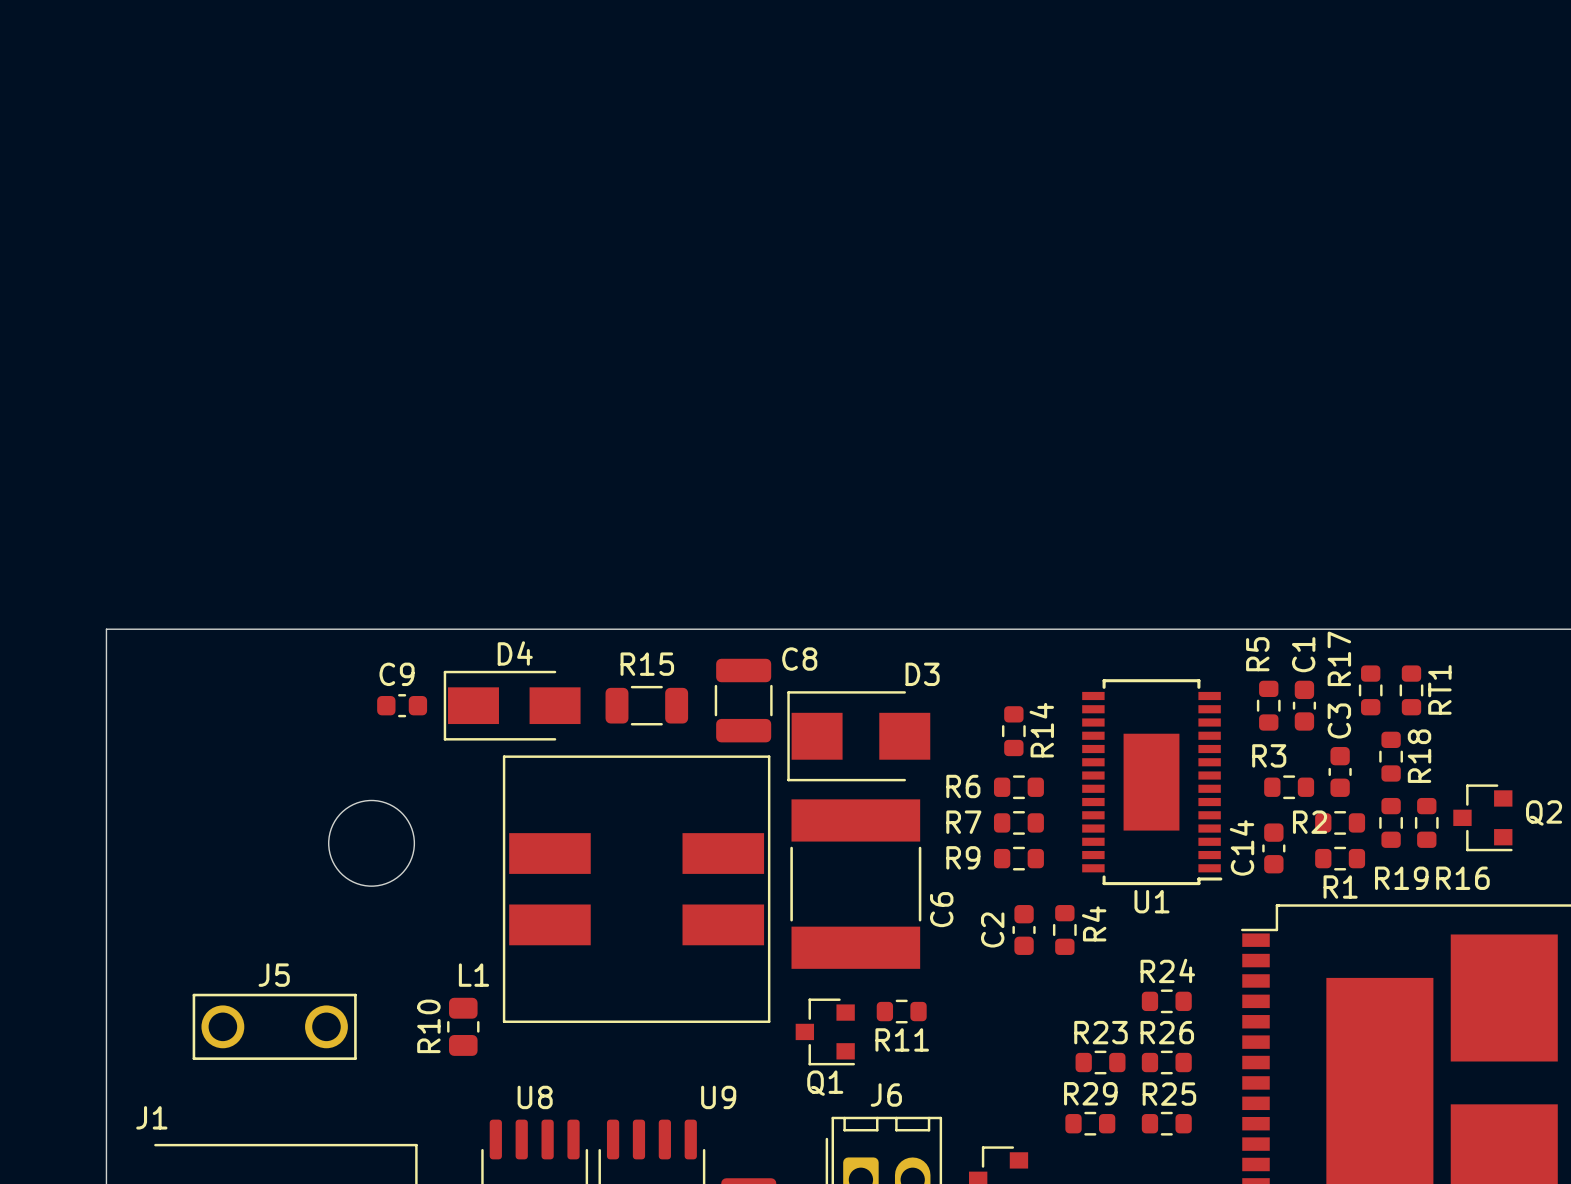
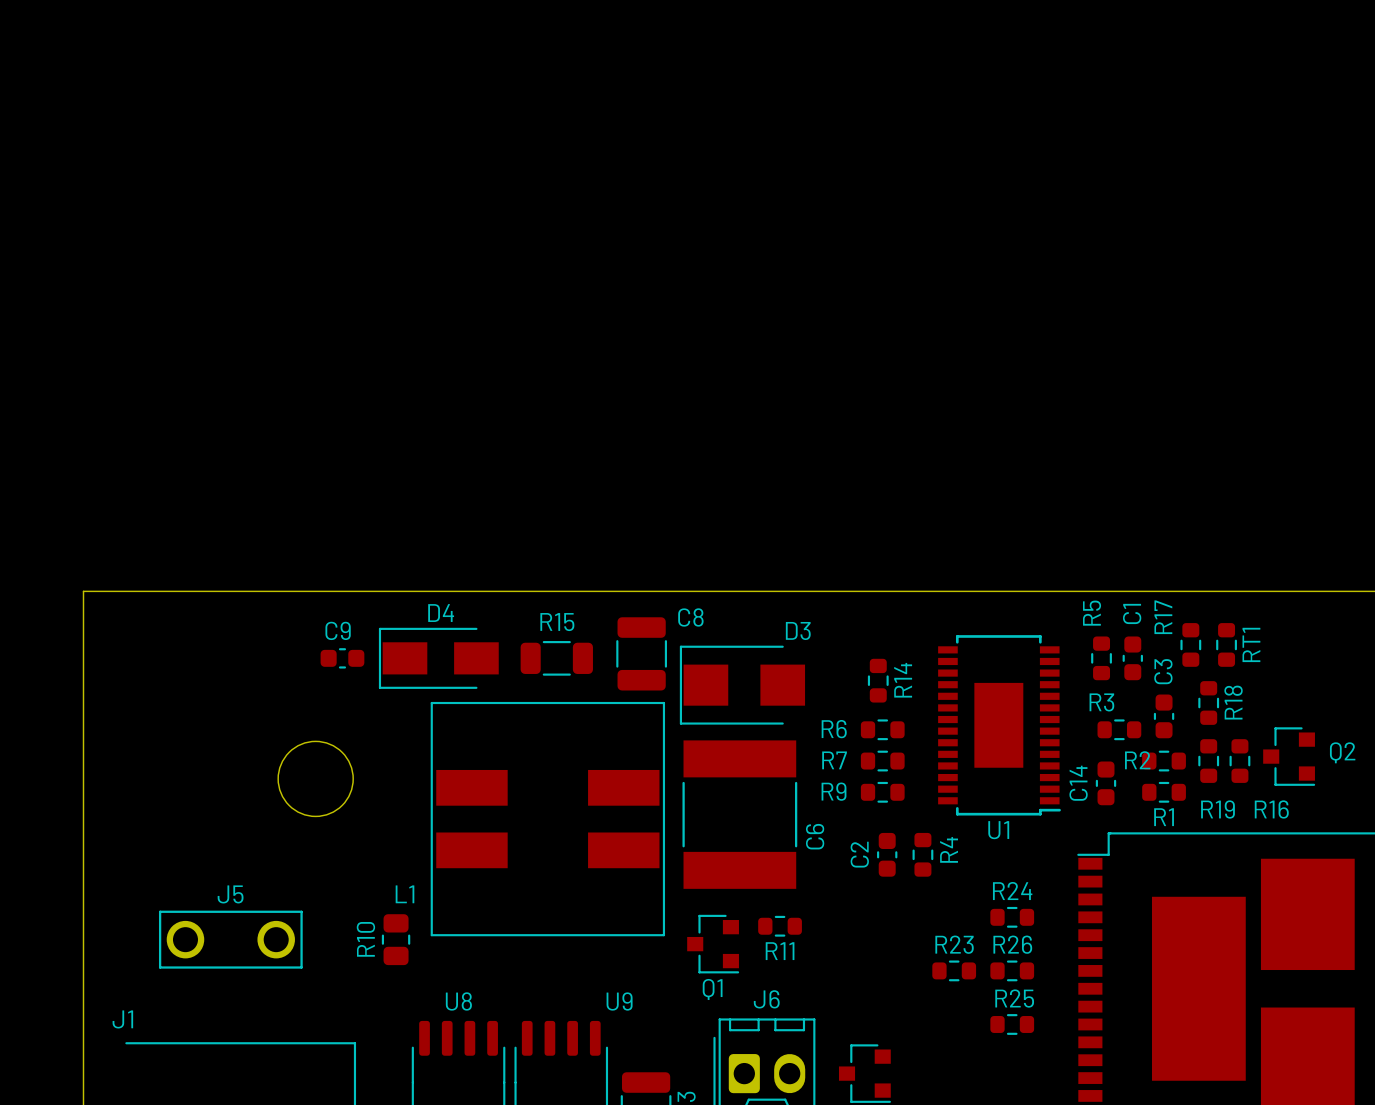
R29: (1090, 1123) -> none

